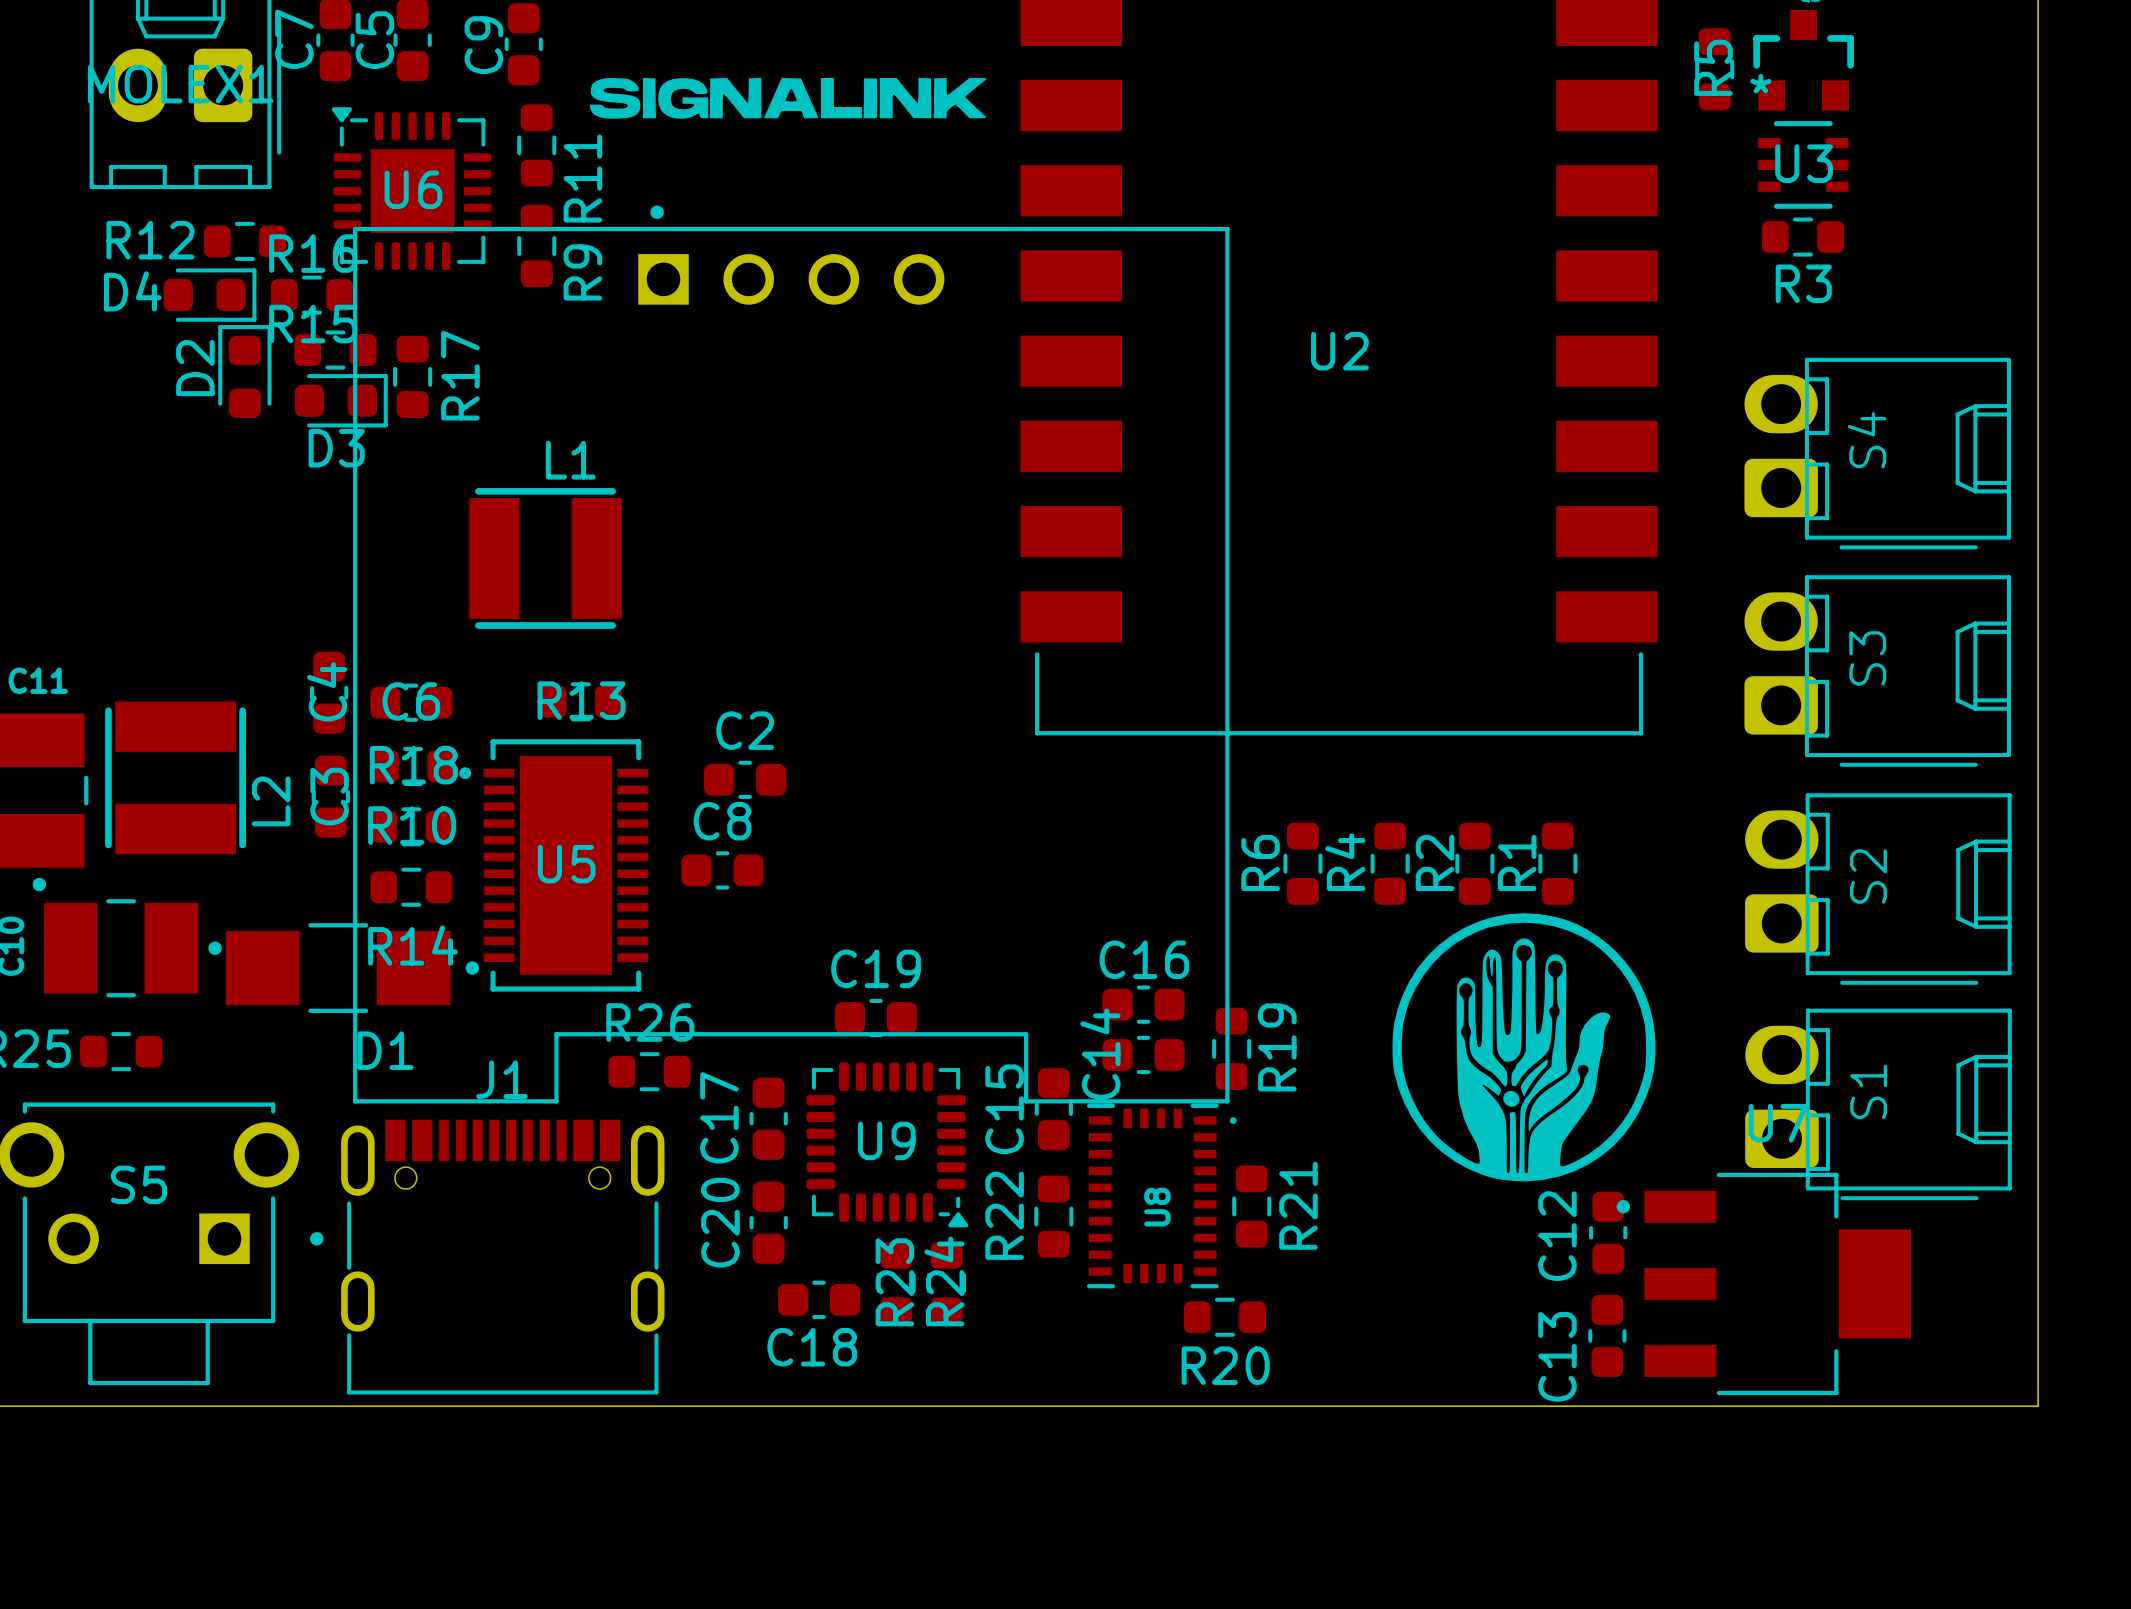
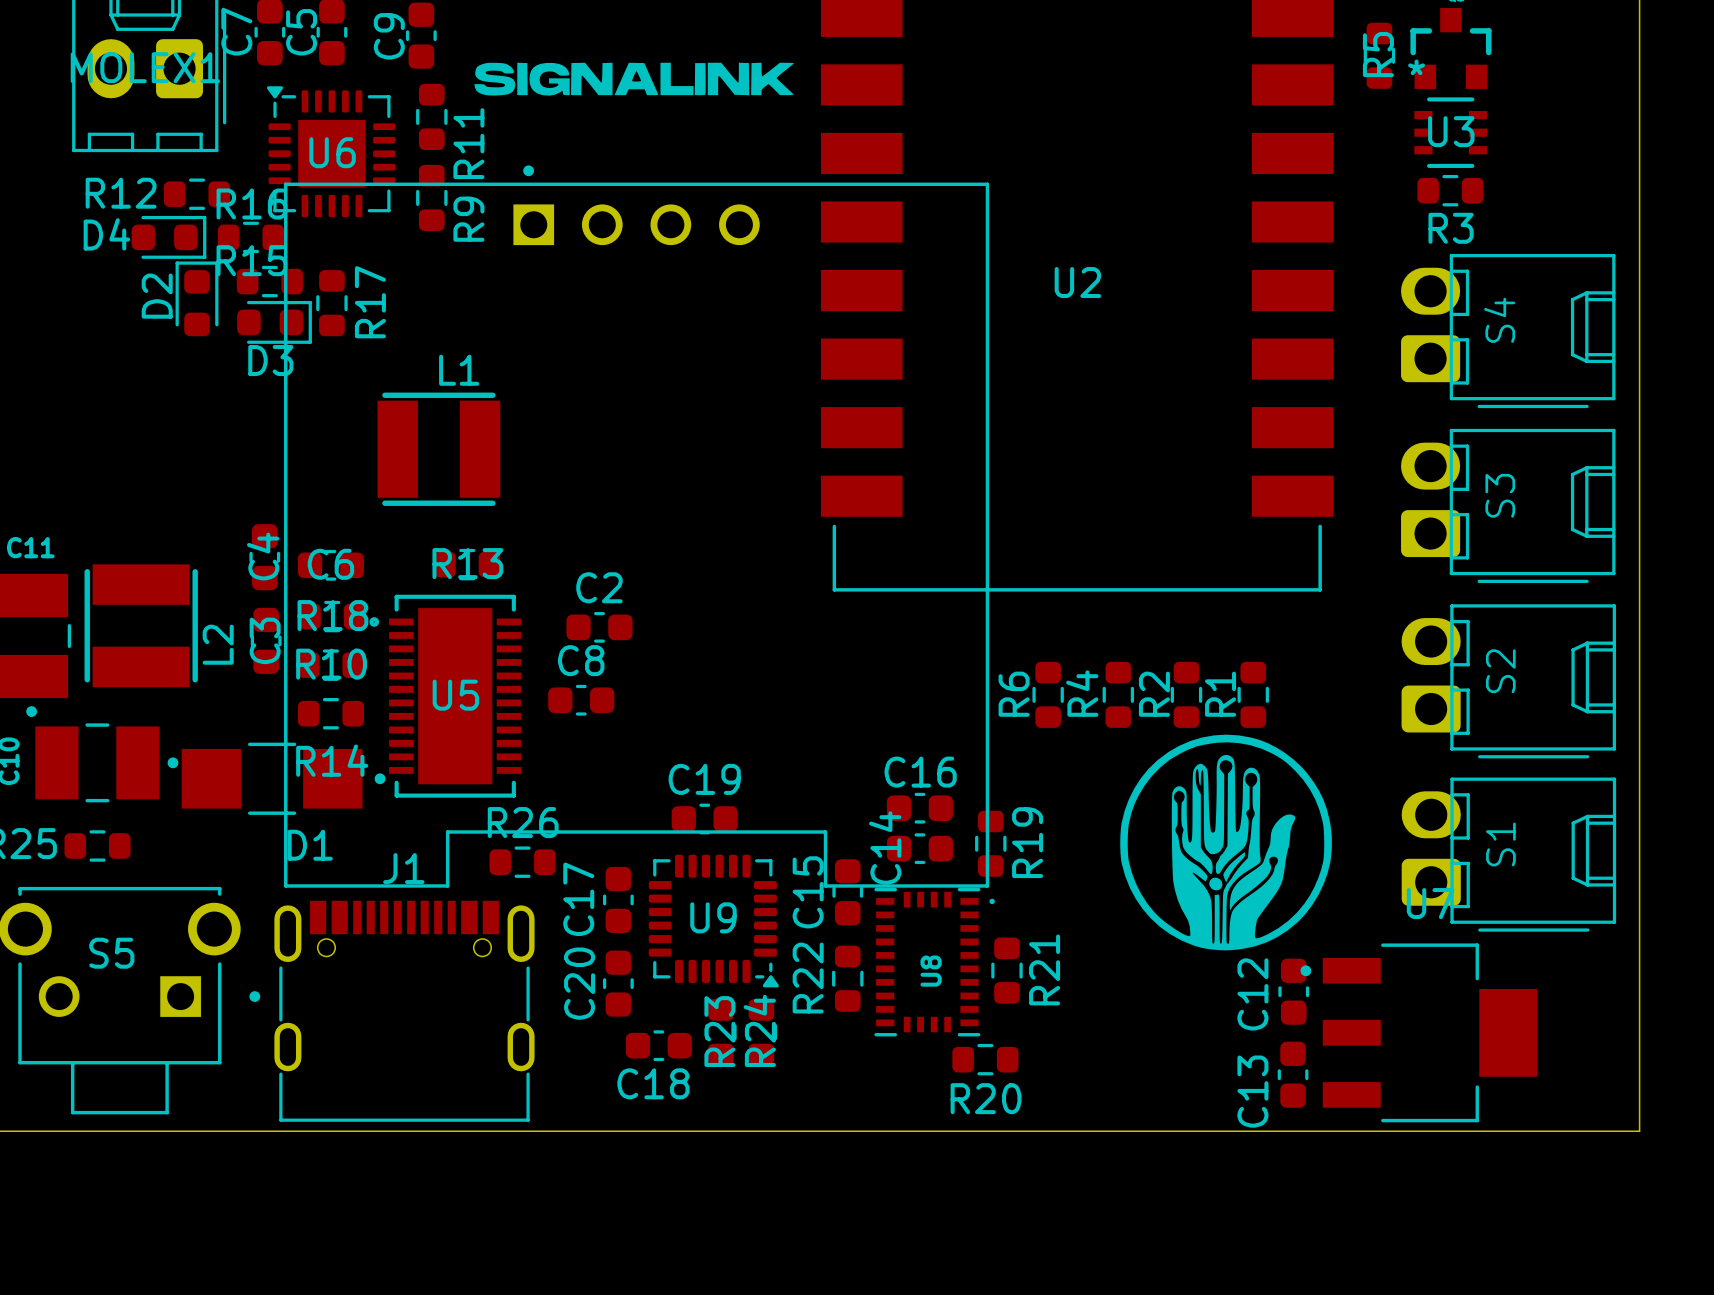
S4 position: (1877, 453) -> (1508, 331)
S3 position: (1877, 670) -> (1508, 505)
S2 position: (1878, 889) -> (1508, 681)
S1 position: (1878, 1104) -> (1508, 854)

